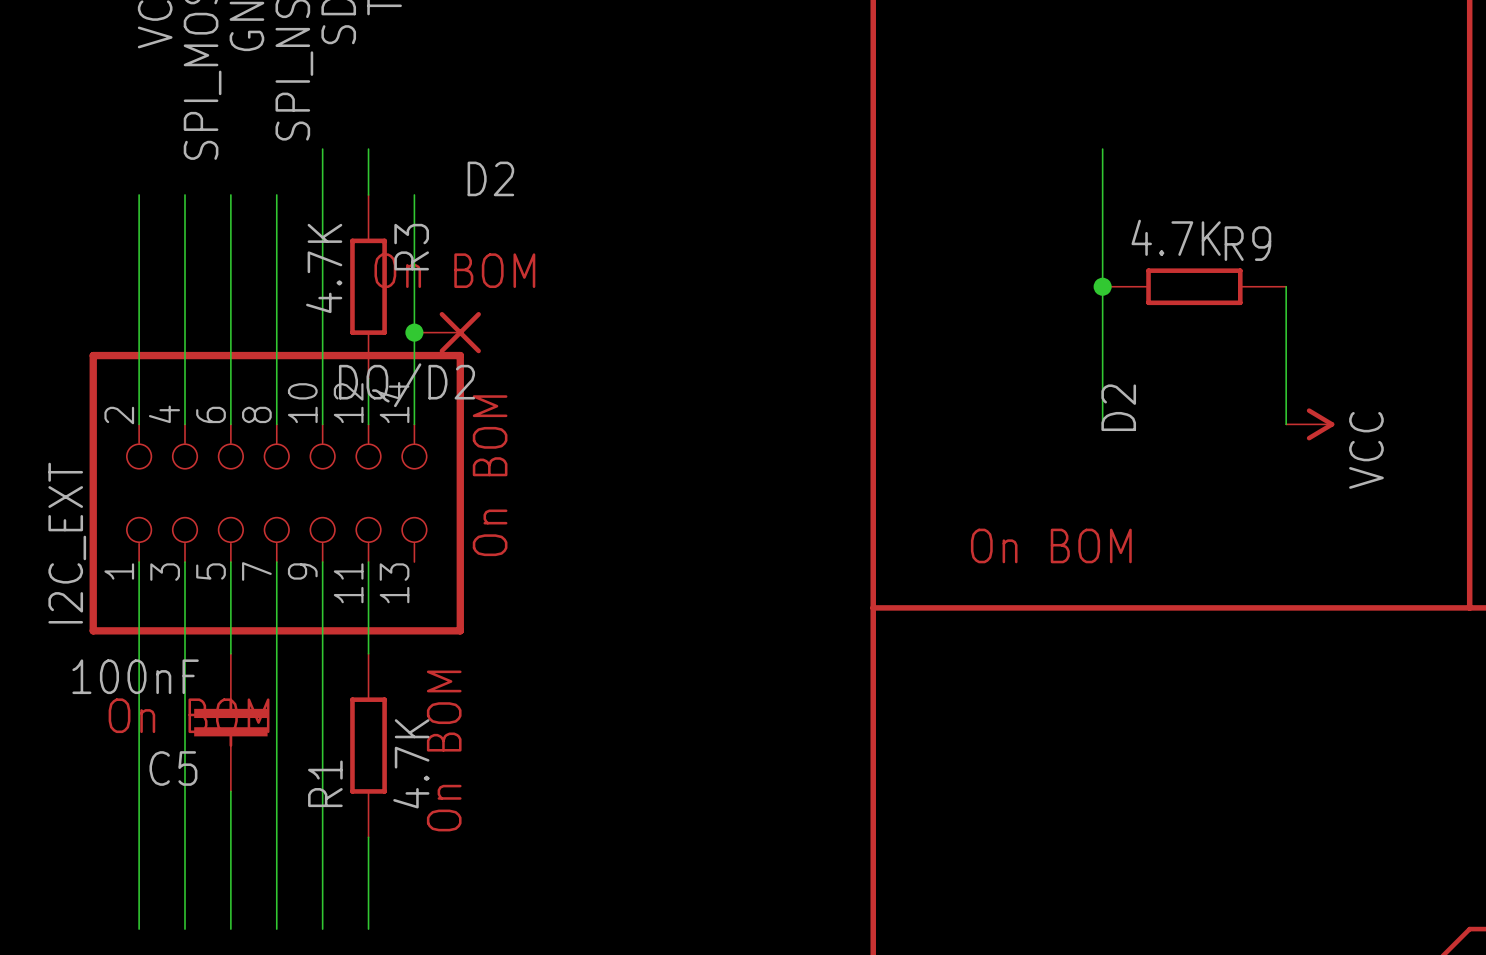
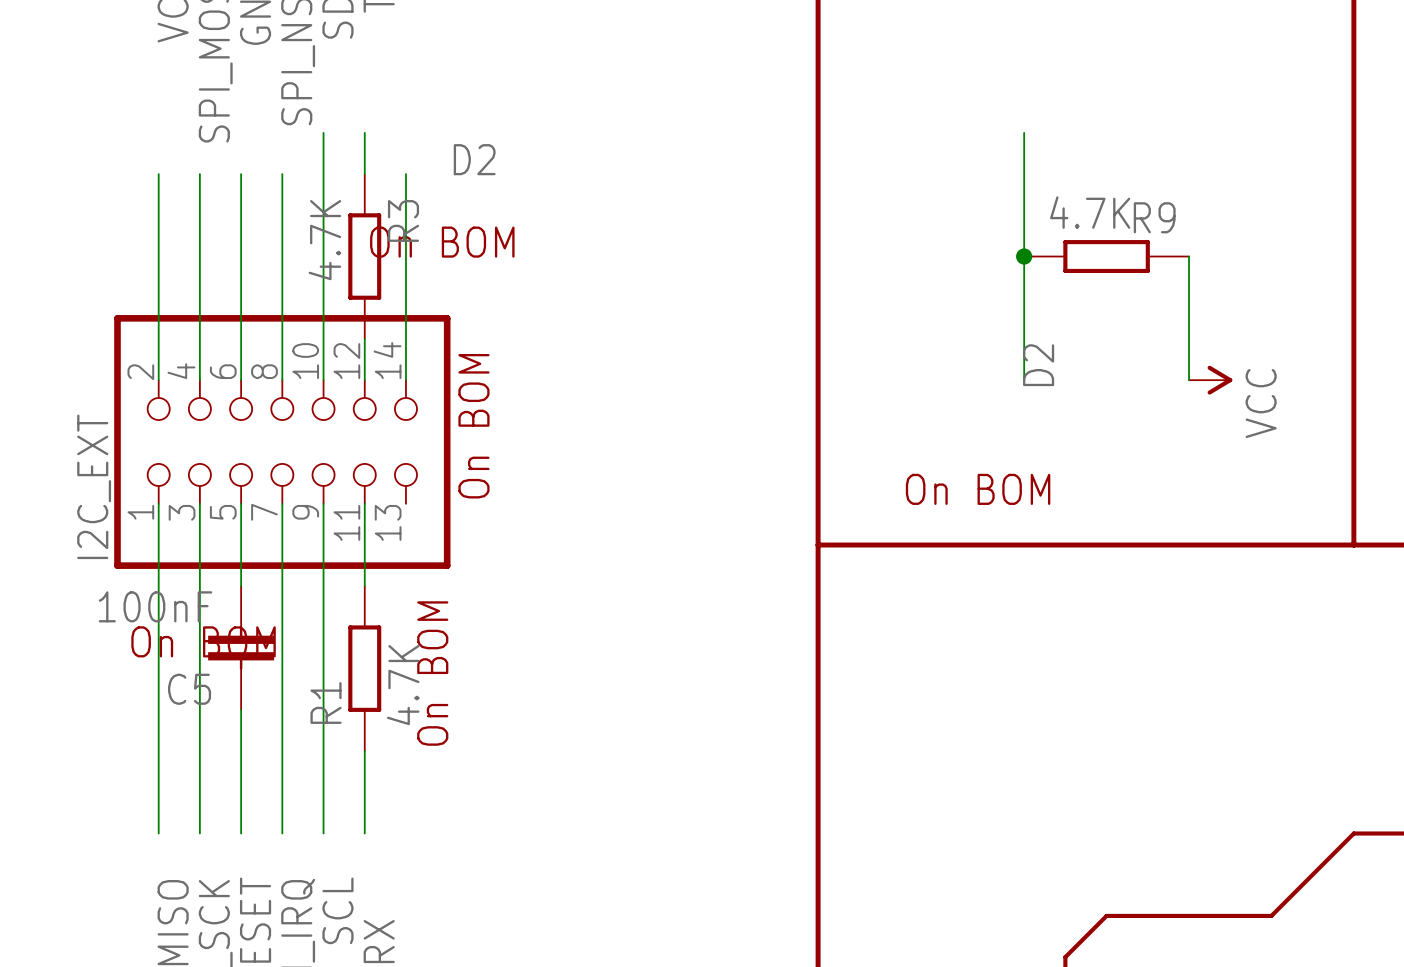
junction: (414, 332) -> none
DQ/D2: (447, 332) -> none

